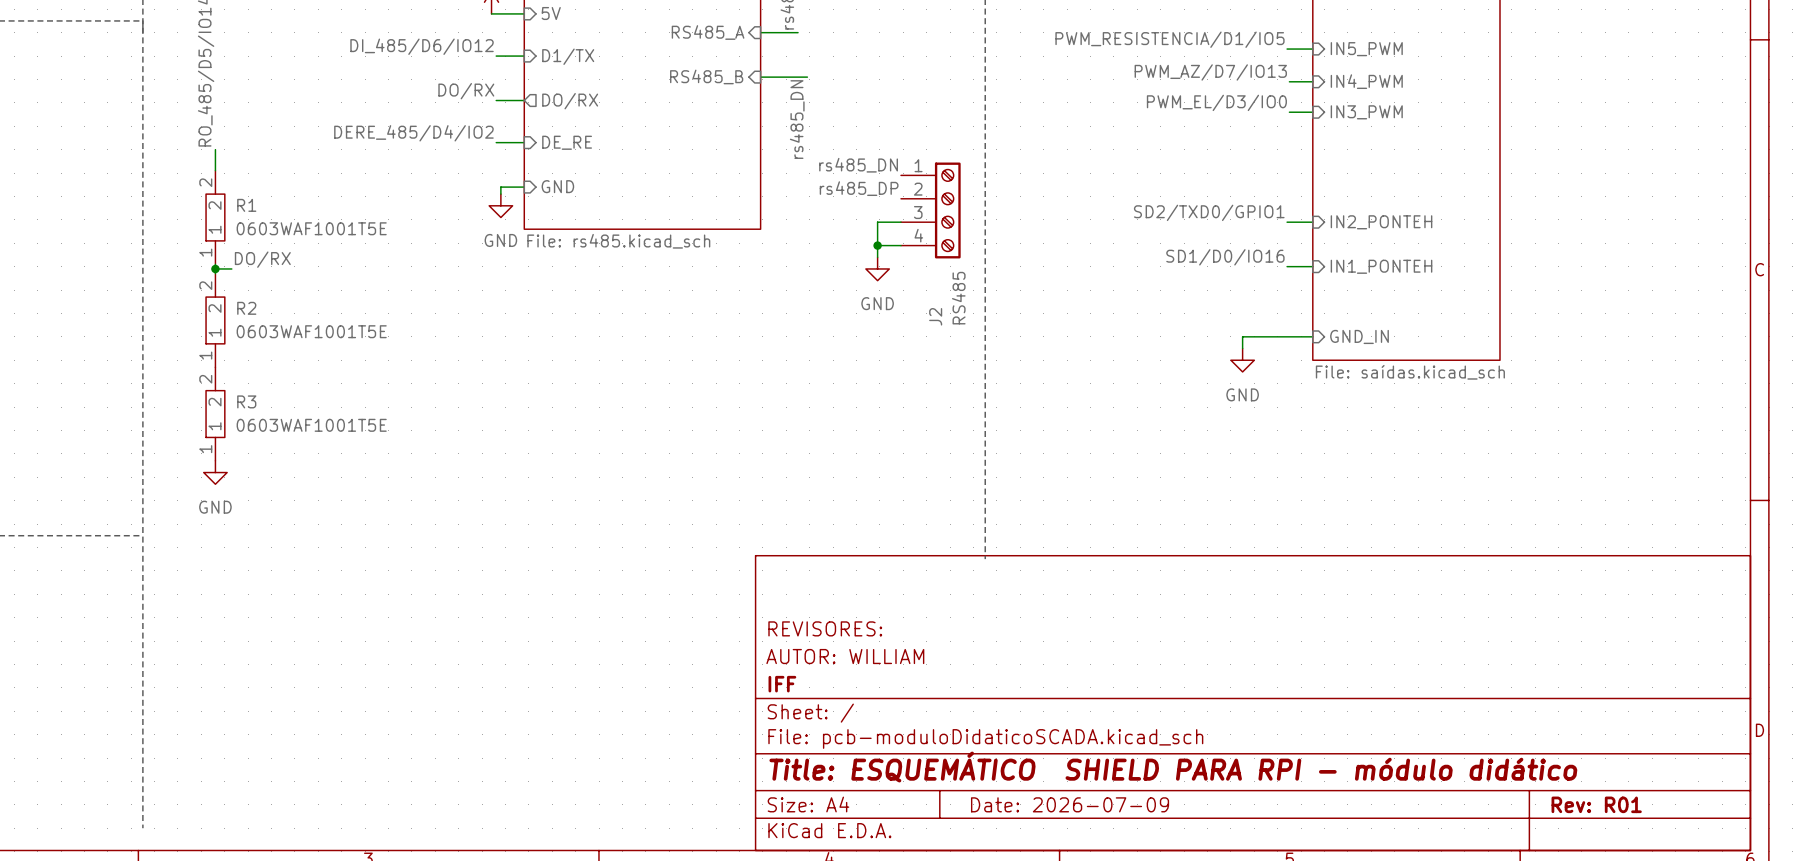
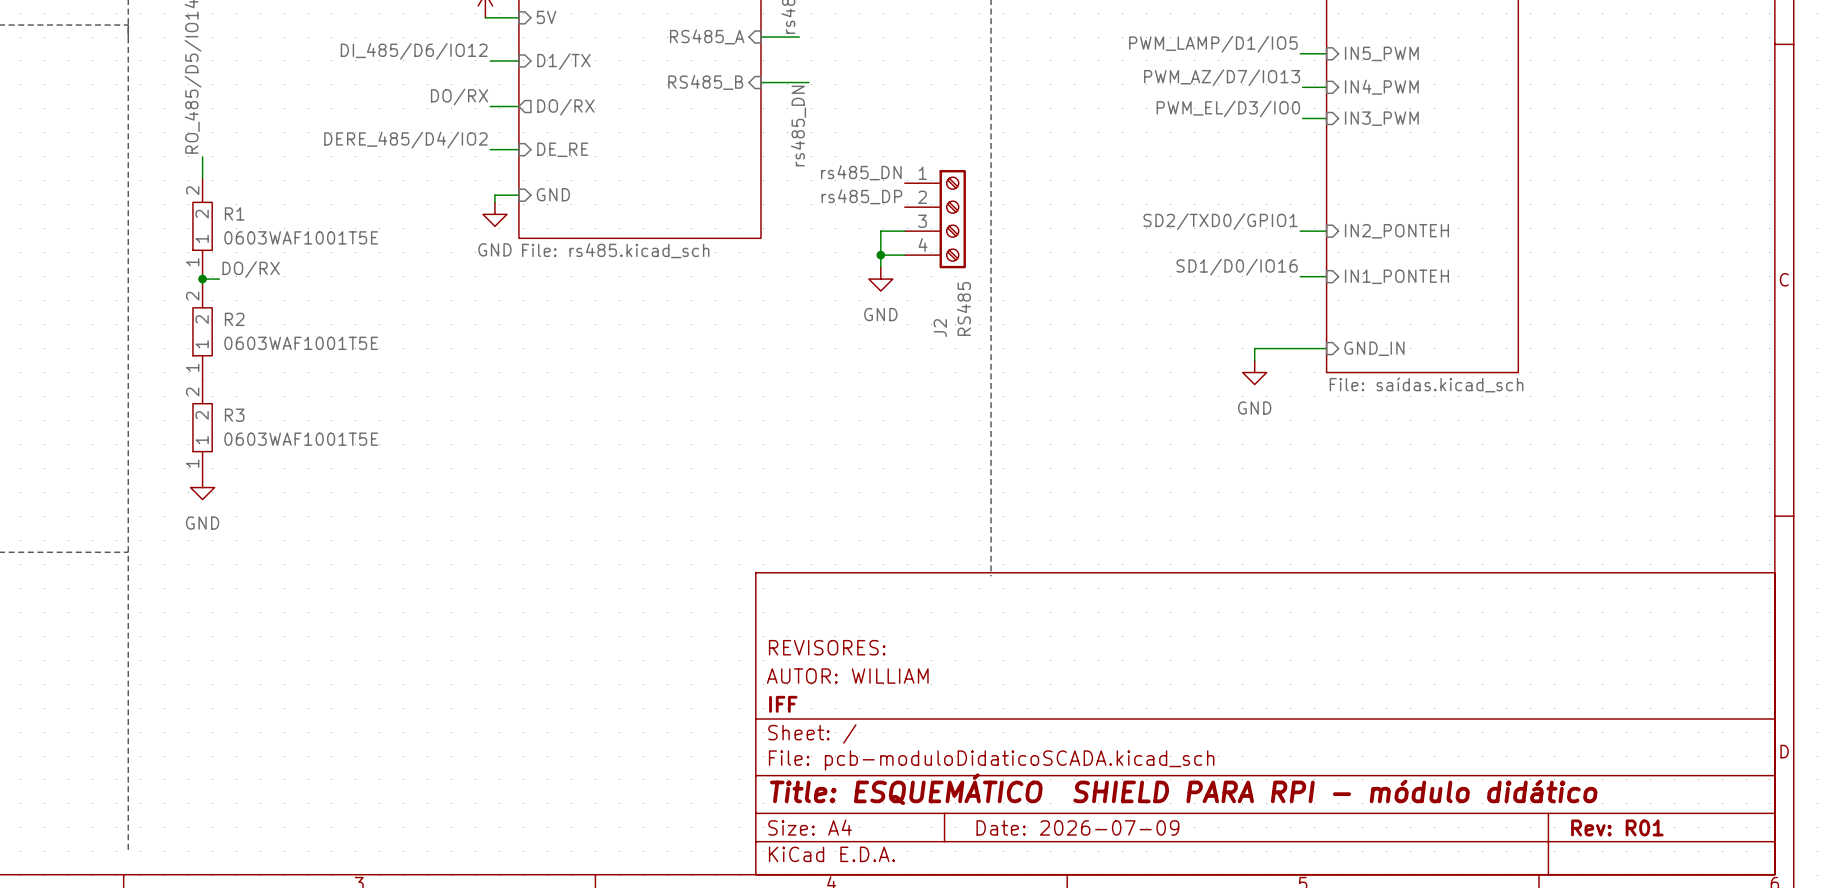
label: PWM_RESISTENCIA/D1/IO5 (1169, 39) -> PWM_LAMP/D1/IO5 (1213, 44)

